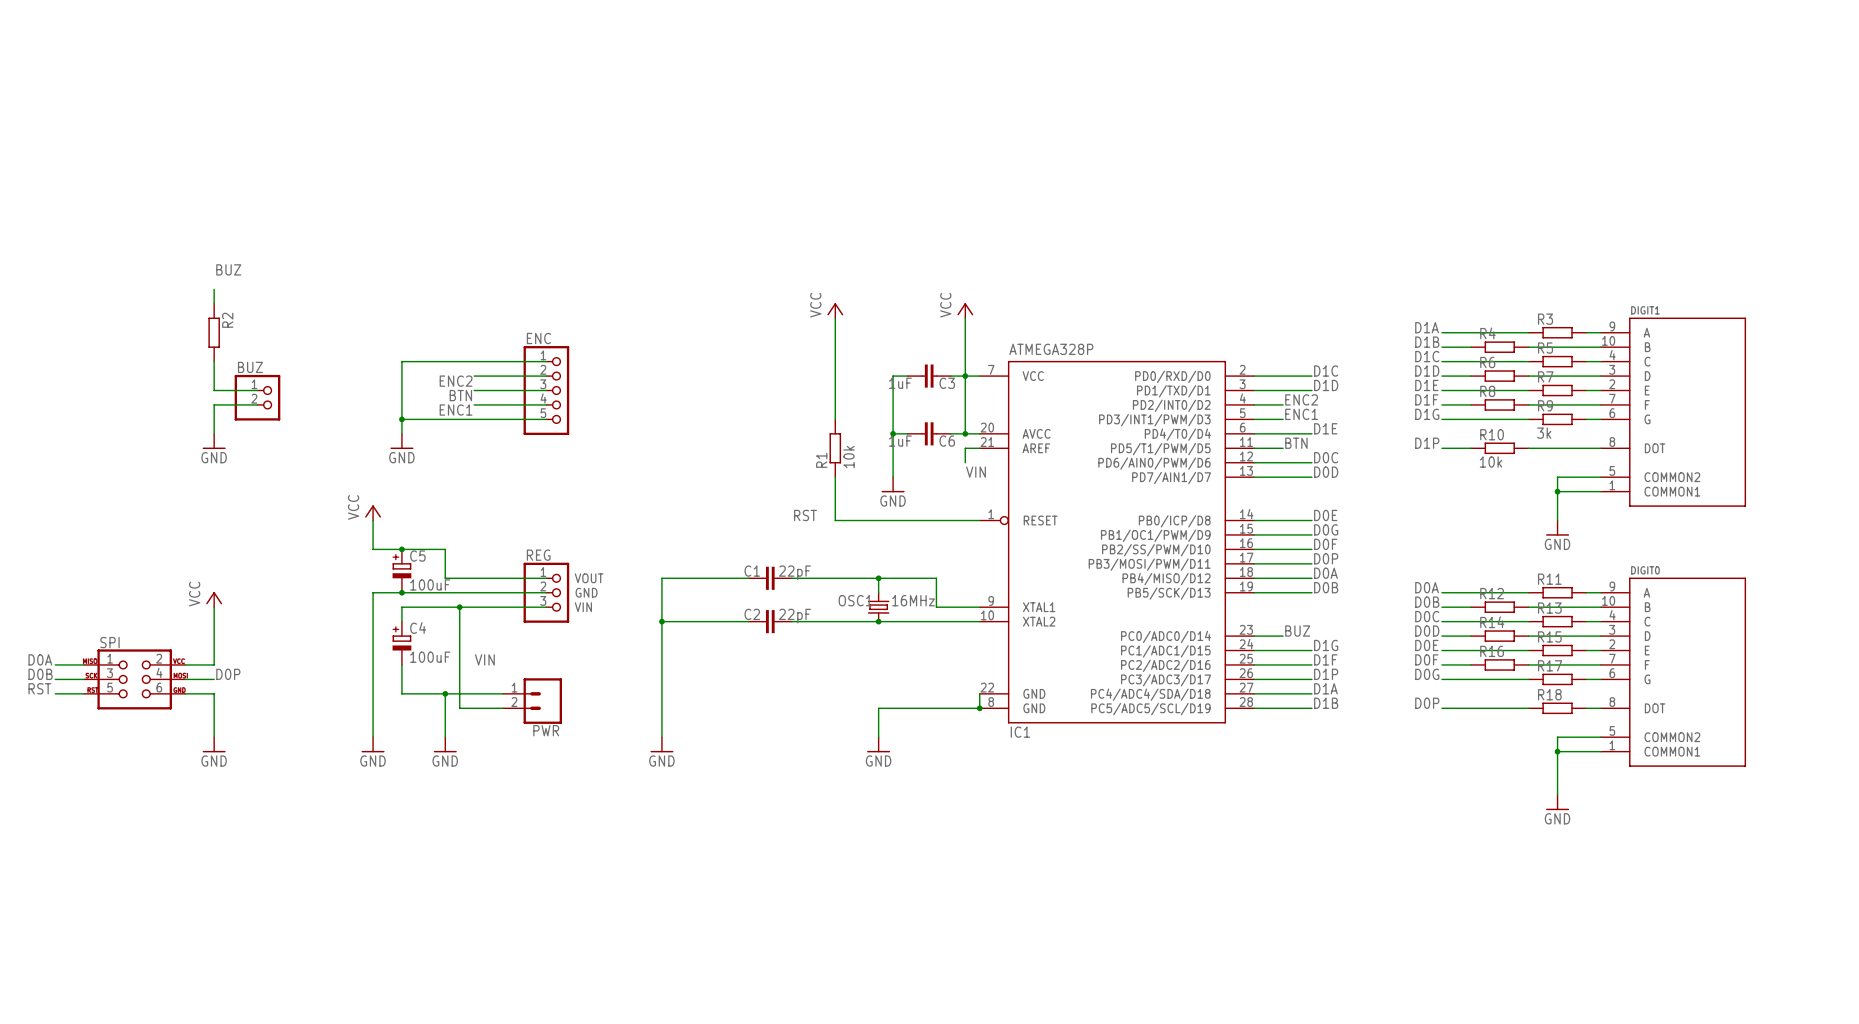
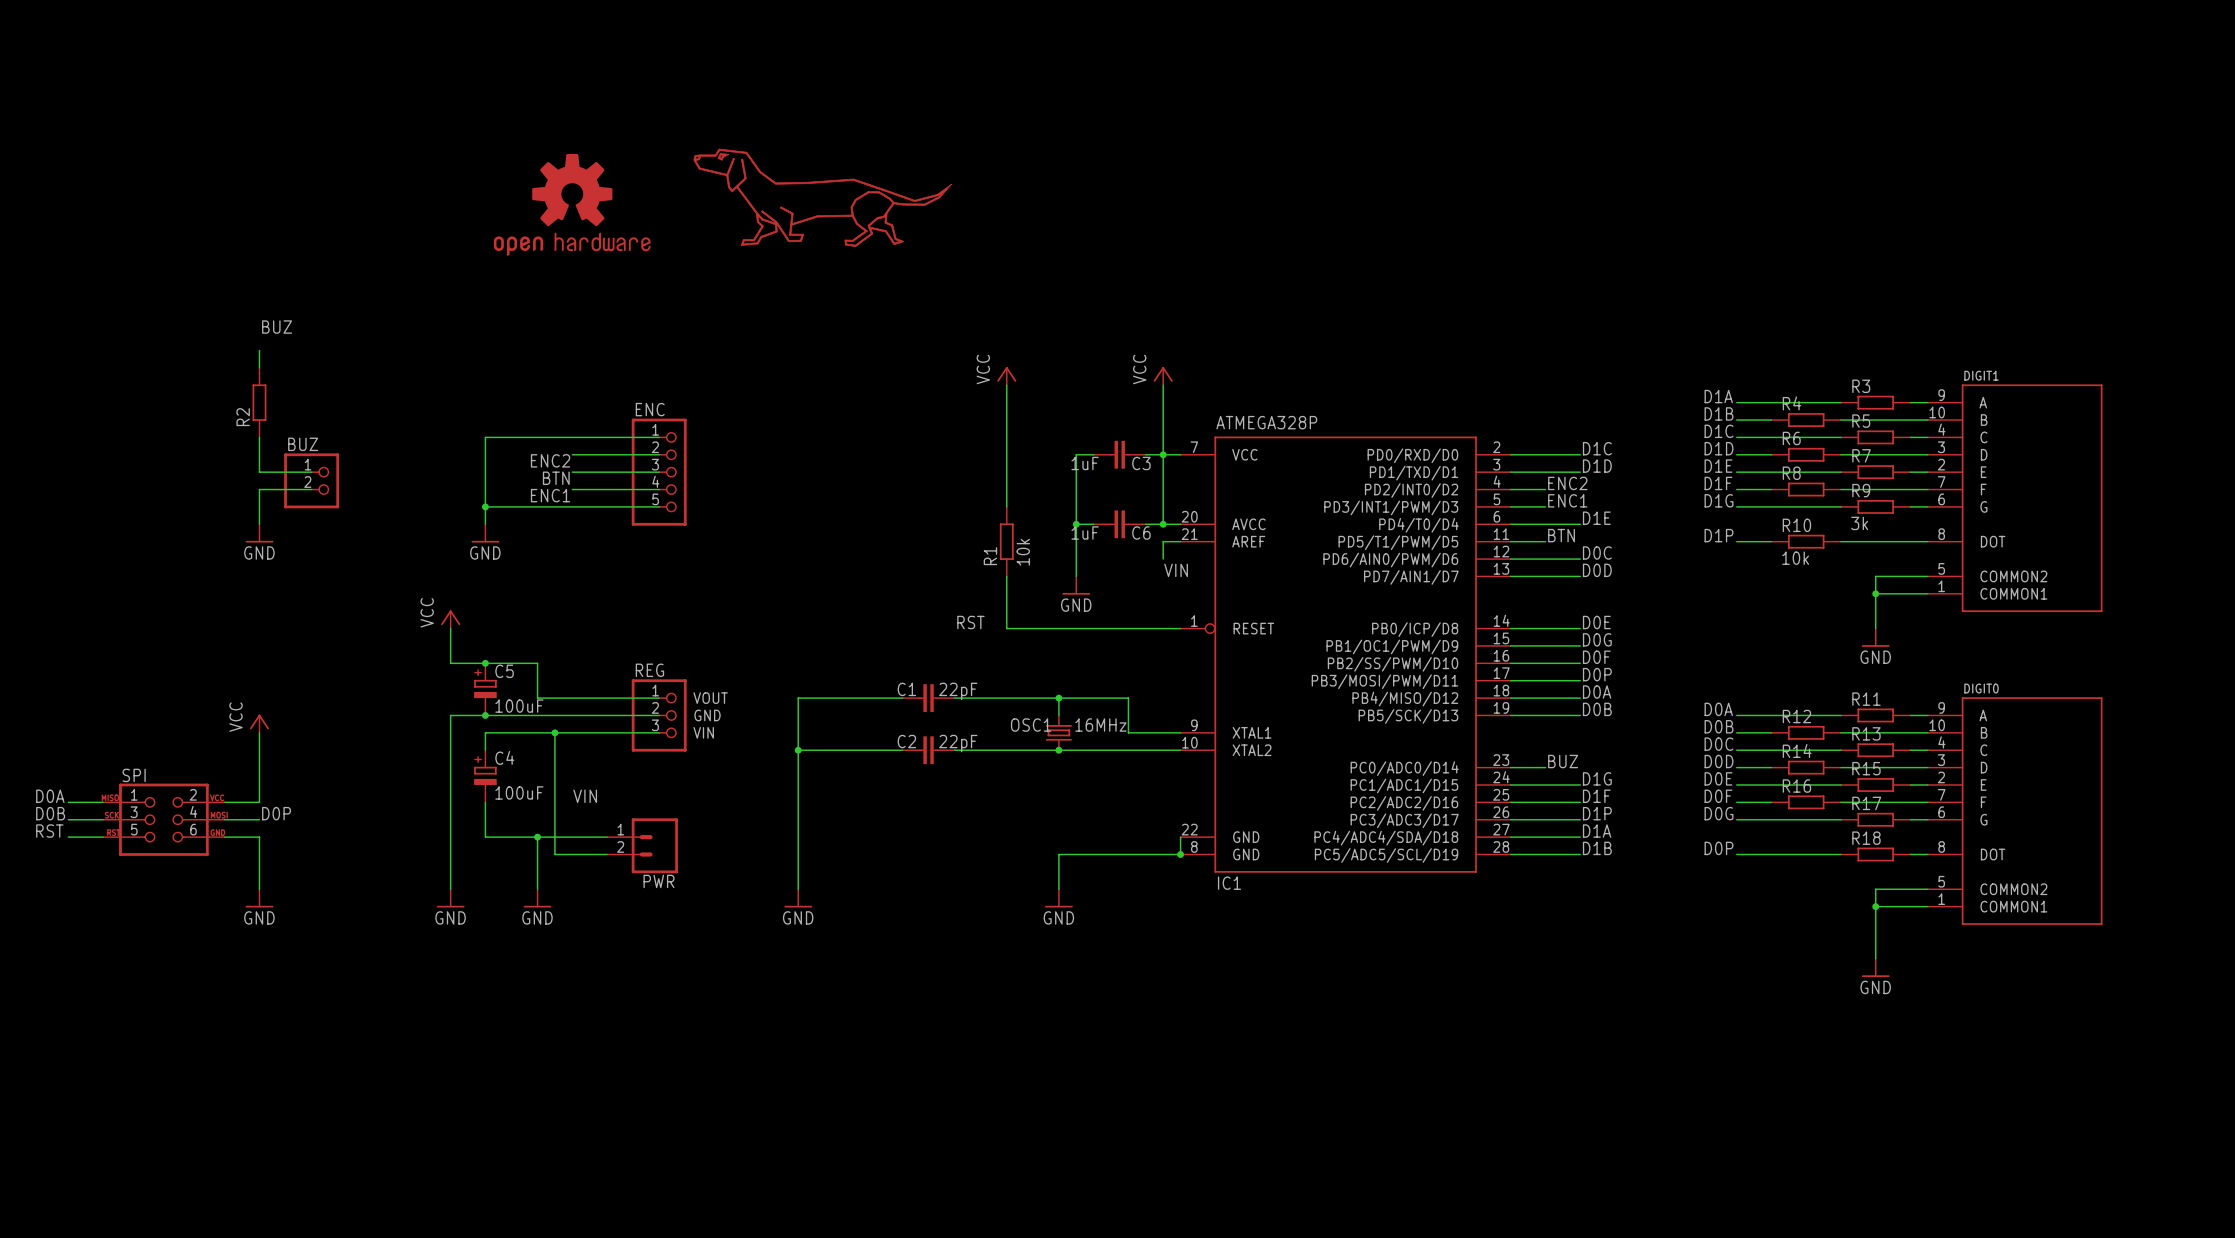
part: none -> (822, 197)
part: none -> (572, 204)
R2 name position: R2 (227, 320) -> R2 (243, 417)

